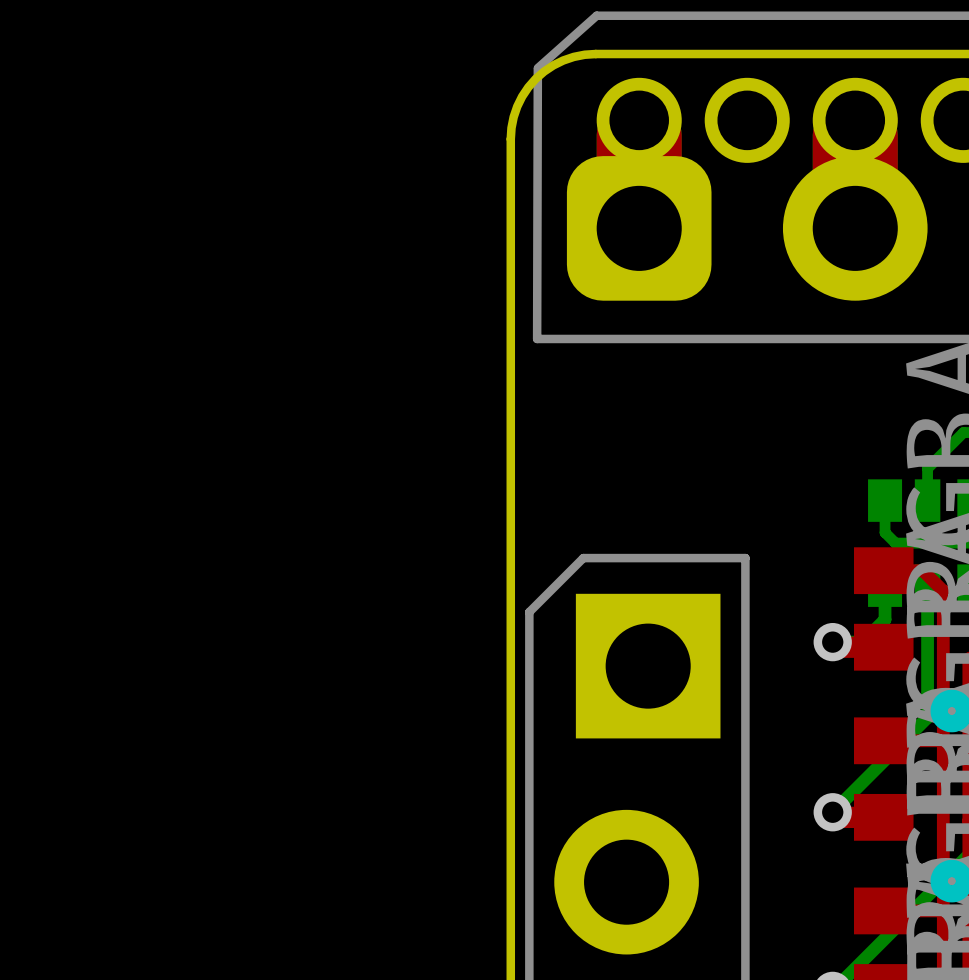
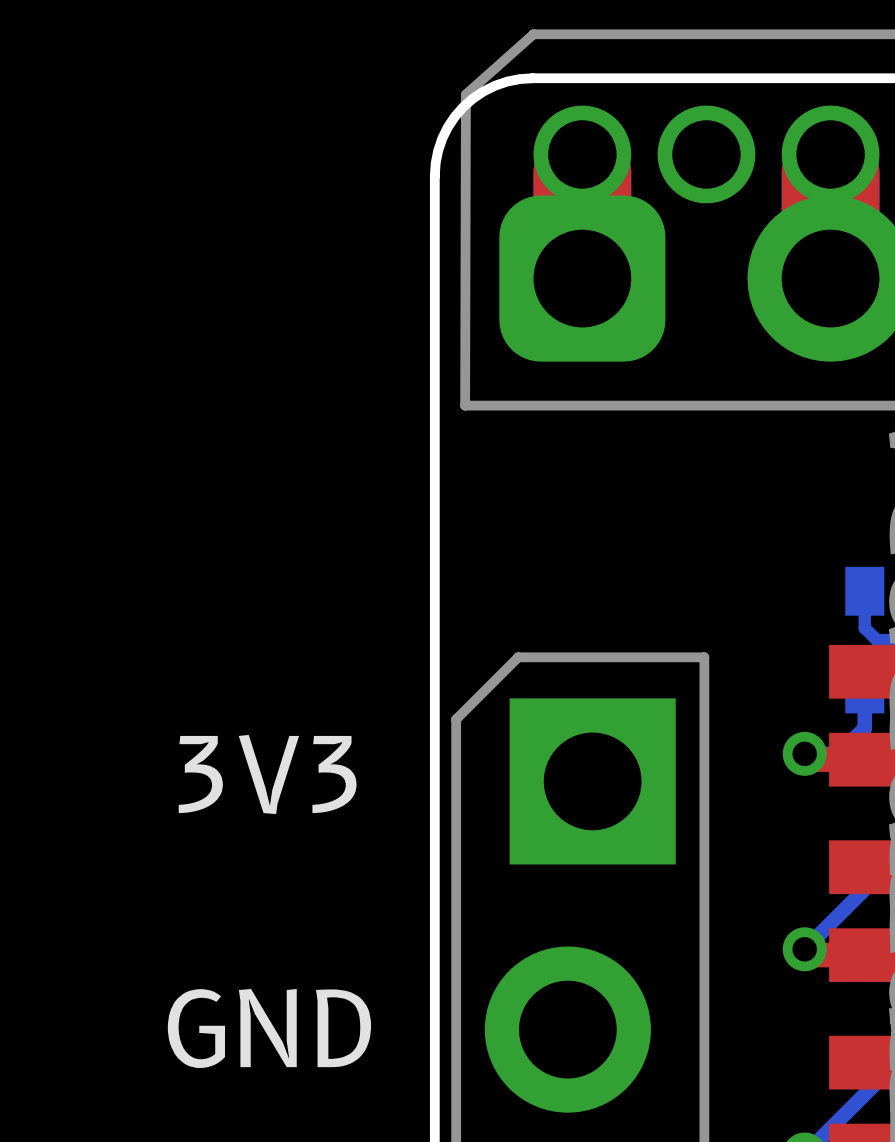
text: none -> 3V3 (267, 774)
text: none -> GND (269, 1028)

